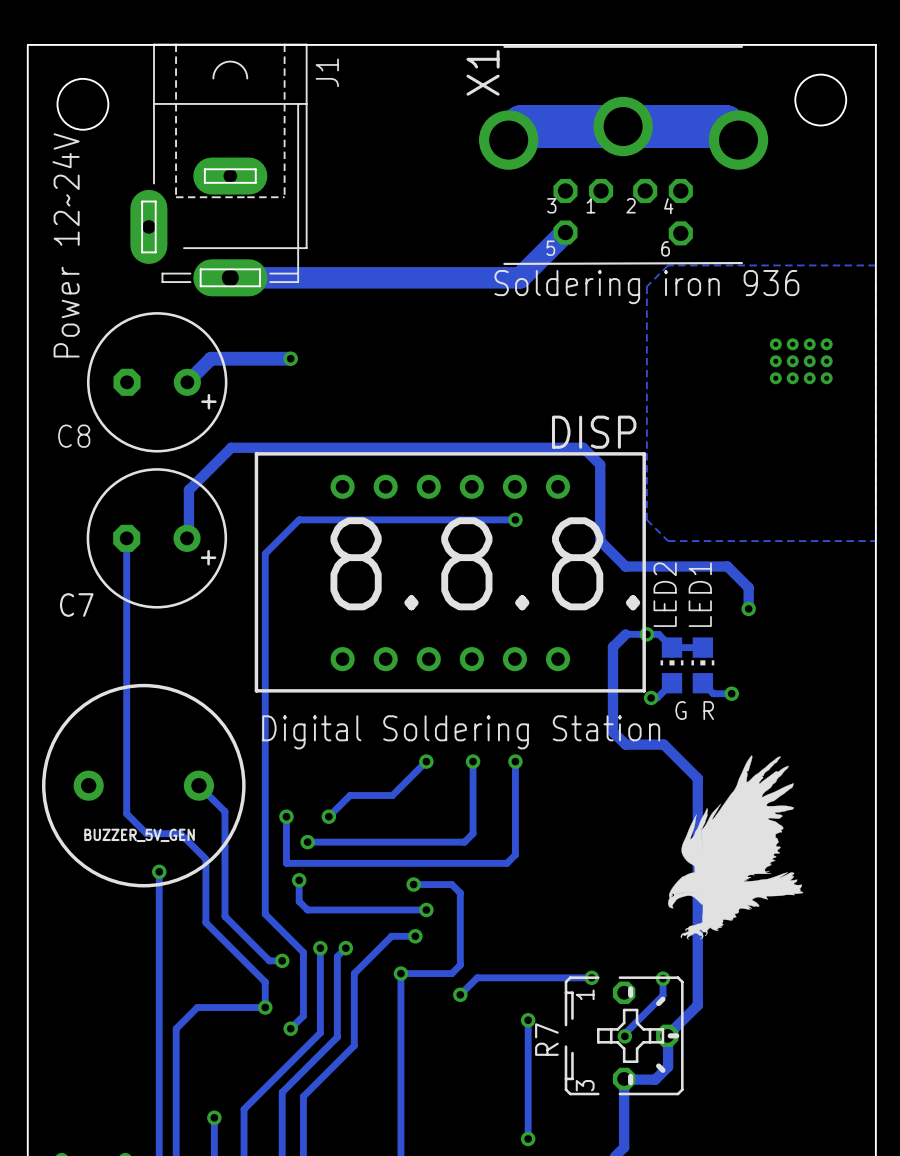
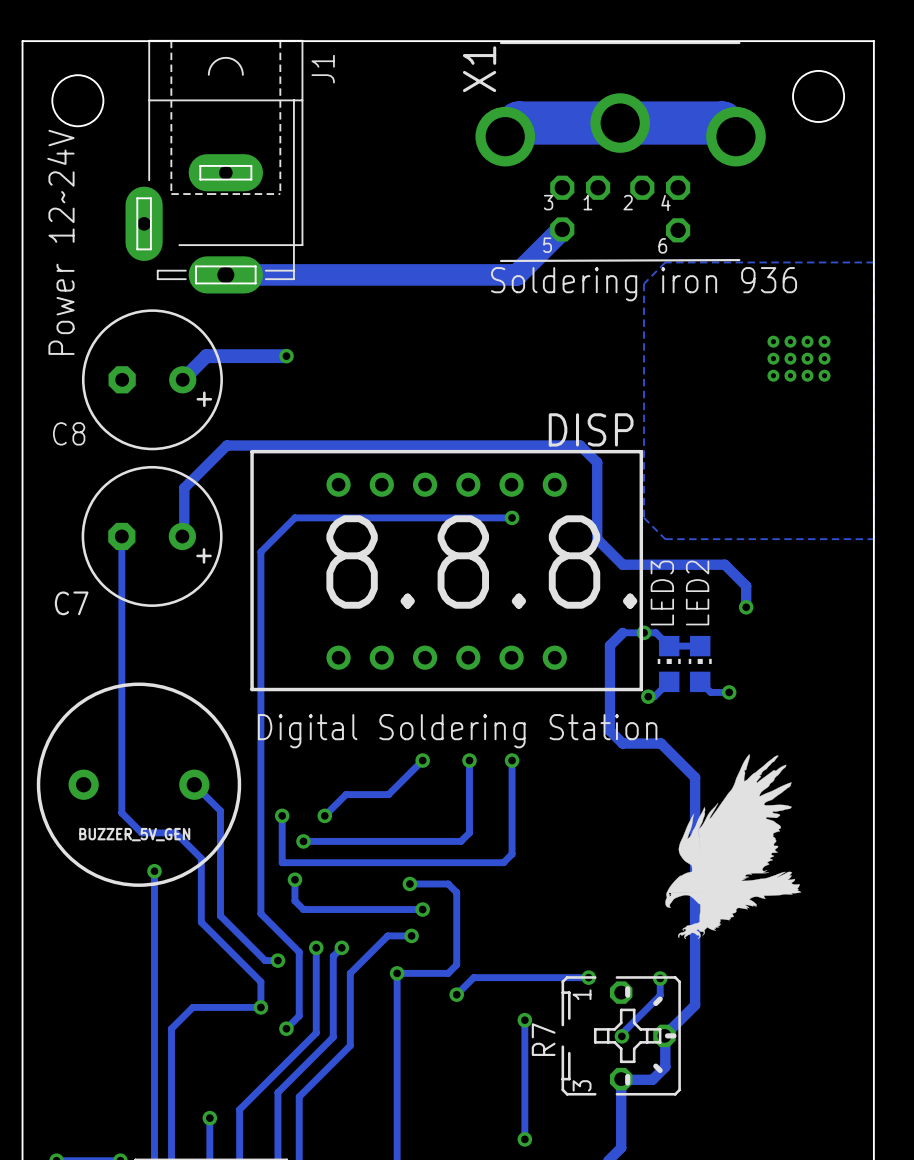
LED2 name: LED2 (665, 594) -> LED3 (662, 592)
LED1 name: LED1 (700, 594) -> LED2 (697, 592)
text: G R (694, 710) -> none

